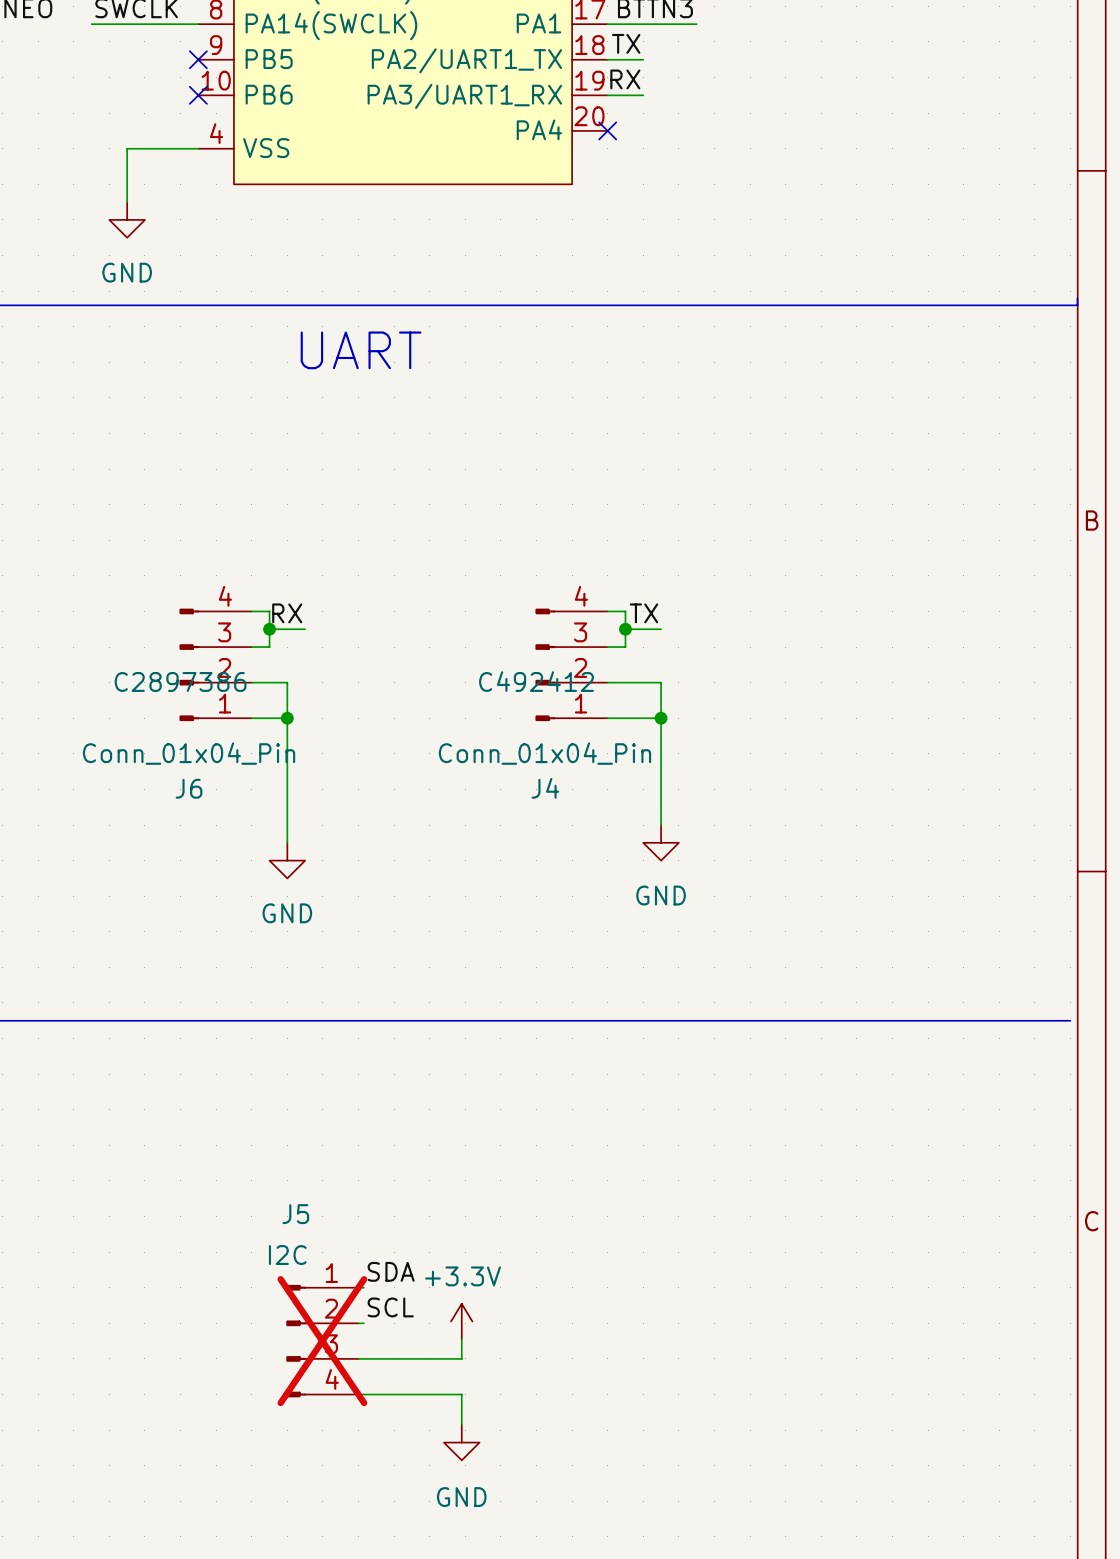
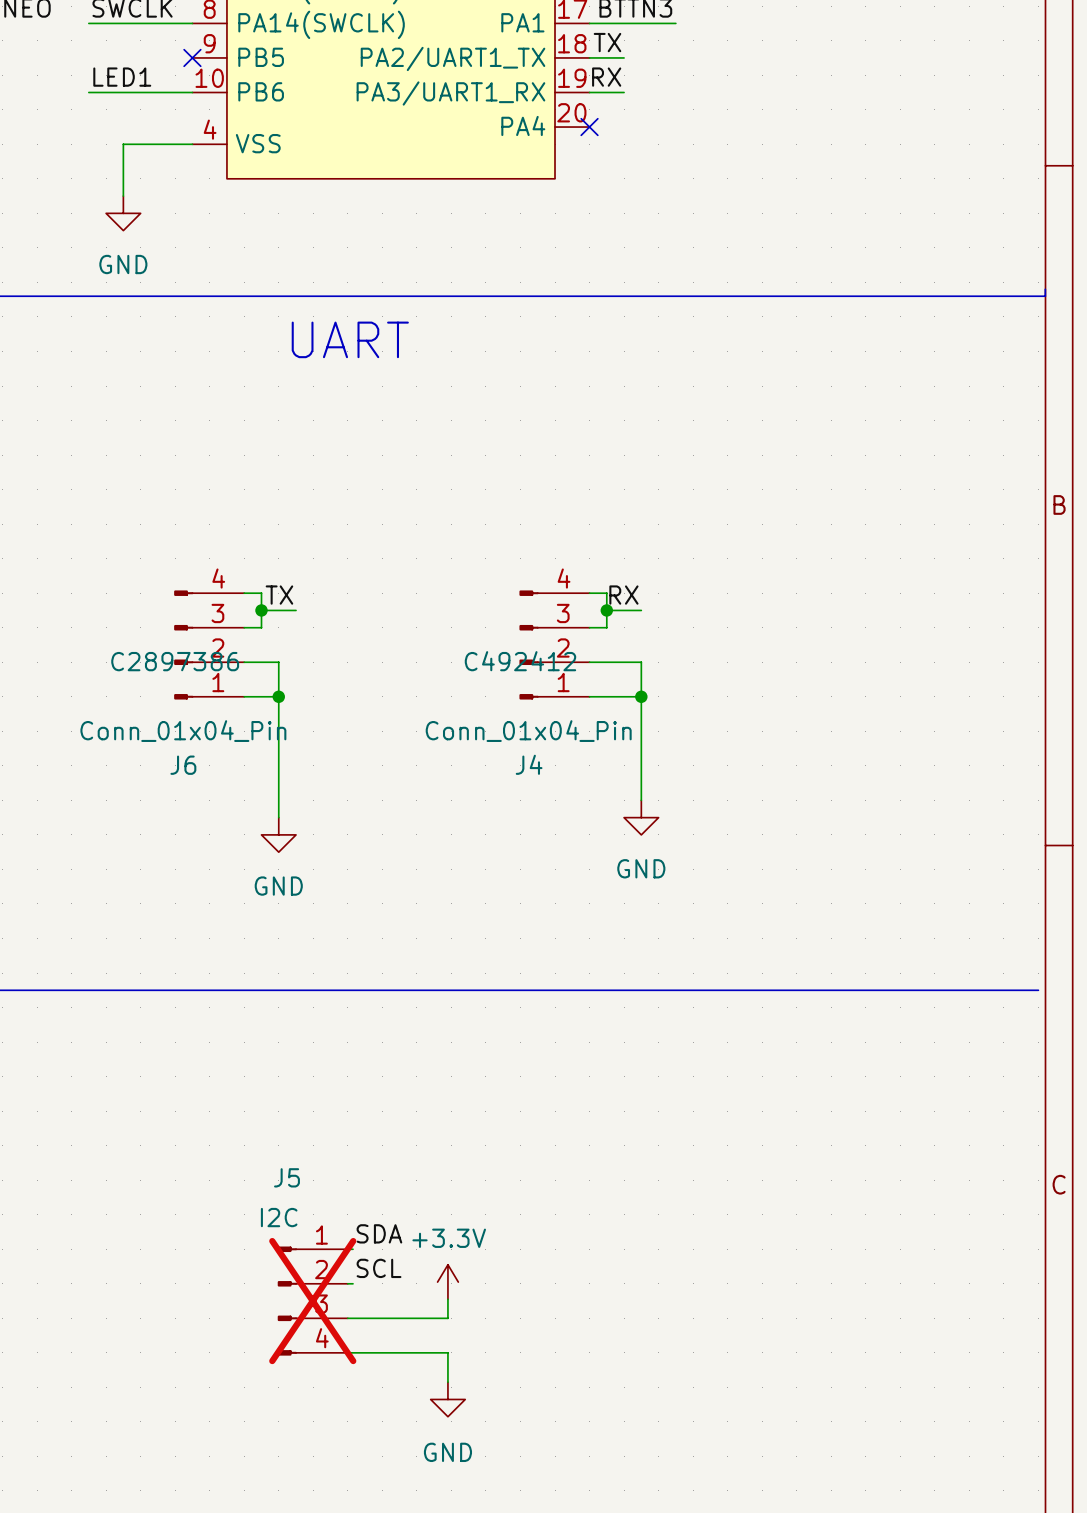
label: none -> LED1 (122, 77)
wire: none -> (88, 92) (192, 92)
no-connect mark: (198, 95) -> none
label: RX (287, 613) -> TX (279, 595)
label: TX (643, 613) -> RX (623, 595)

